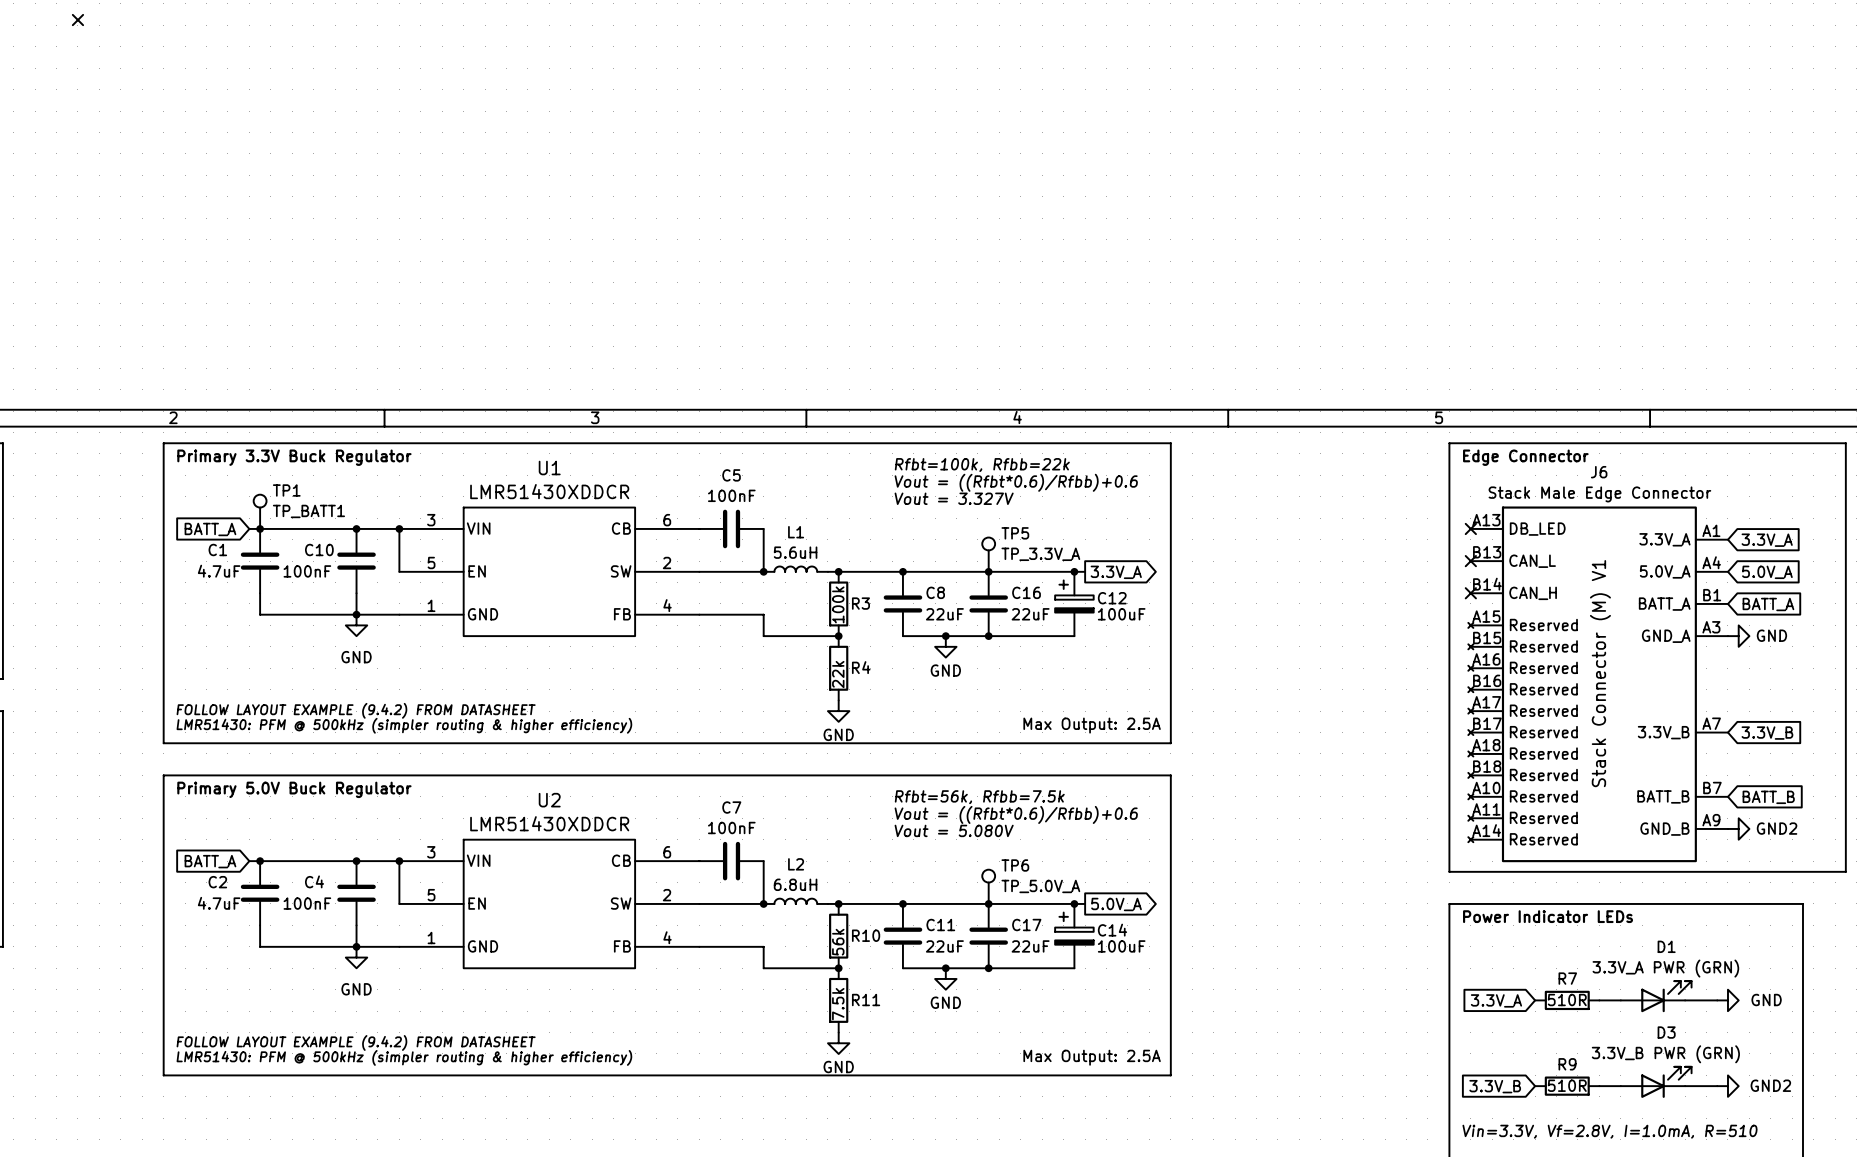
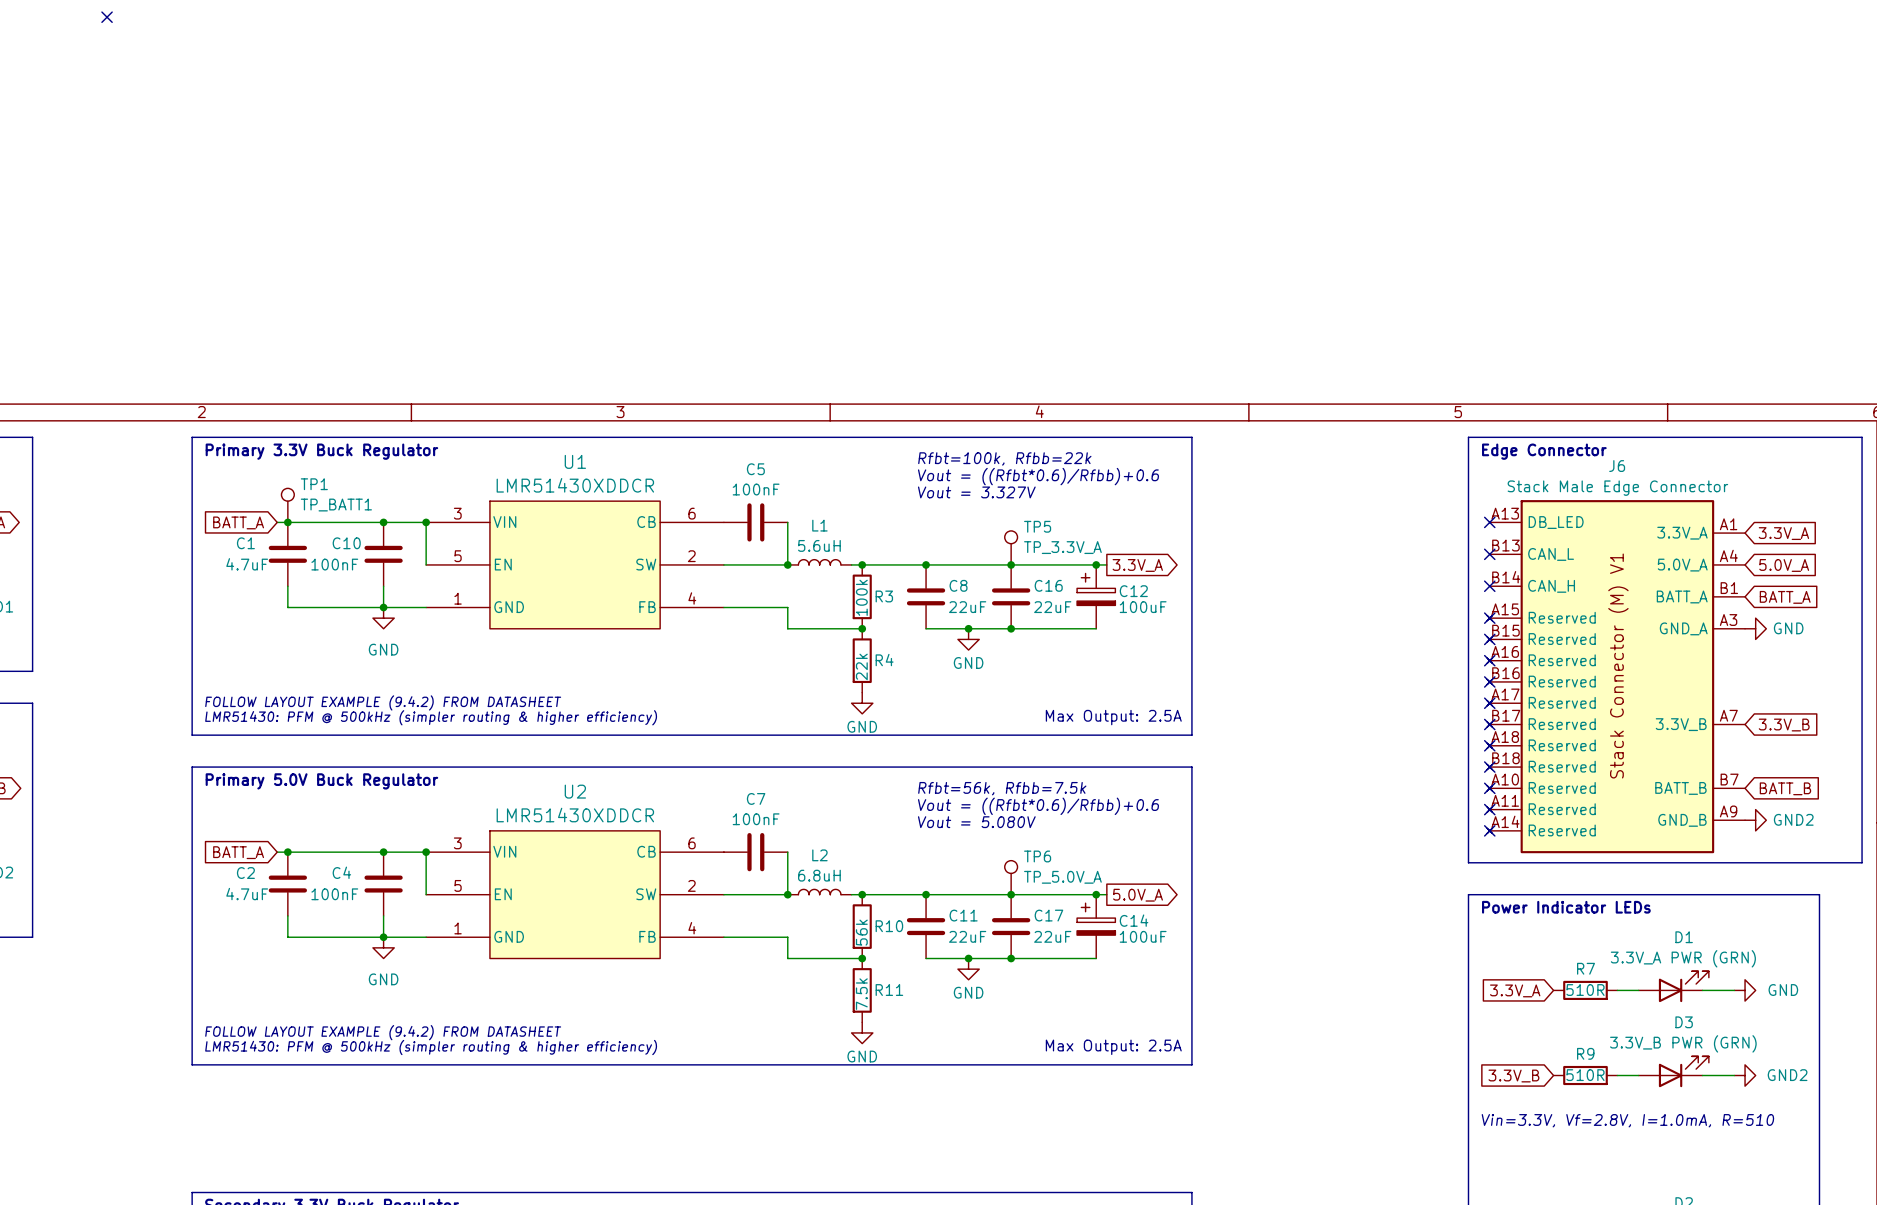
no-connect mark: none -> (1489, 618)
no-connect mark: none -> (1489, 639)
no-connect mark: none -> (1489, 660)
no-connect mark: none -> (1489, 681)
no-connect mark: none -> (1489, 703)
no-connect mark: none -> (1489, 724)
no-connect mark: none -> (1489, 745)
no-connect mark: none -> (1489, 767)
no-connect mark: none -> (1489, 788)
no-connect mark: none -> (1489, 809)
no-connect mark: none -> (1489, 830)

